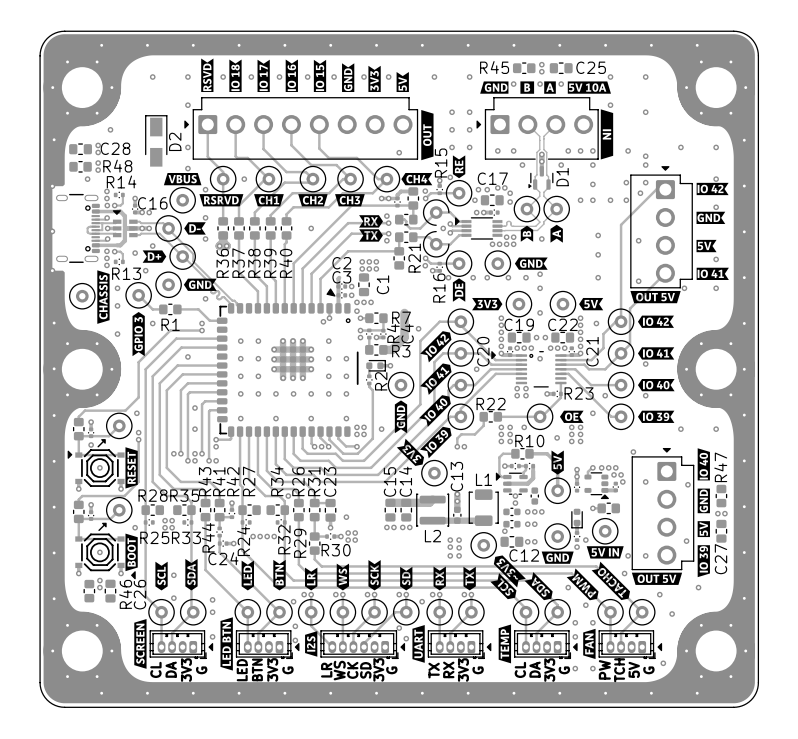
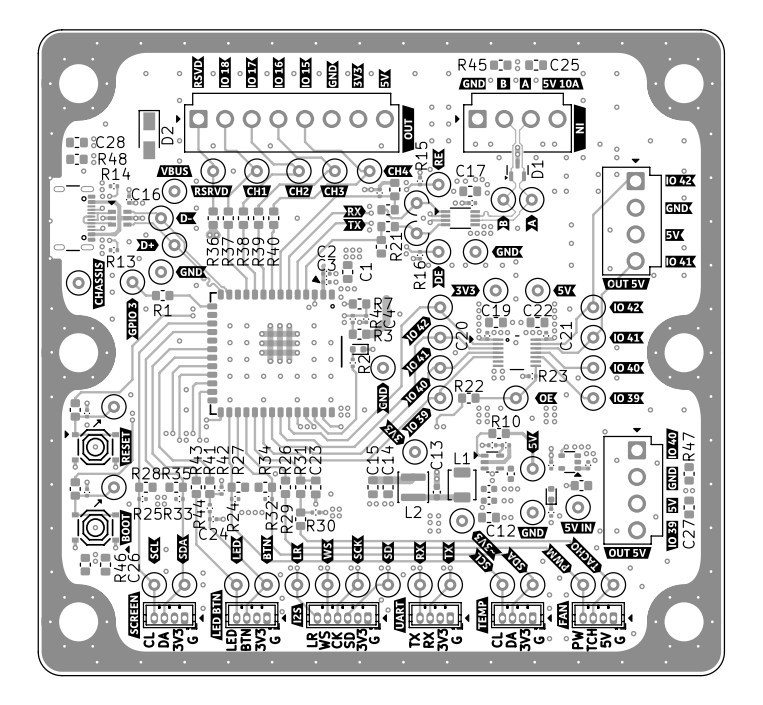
via: (592, 150) -> none
via: none -> (213, 145)
via: none -> (270, 145)
via: none -> (583, 157)
via: (640, 193) -> none
via: (610, 200) -> none

